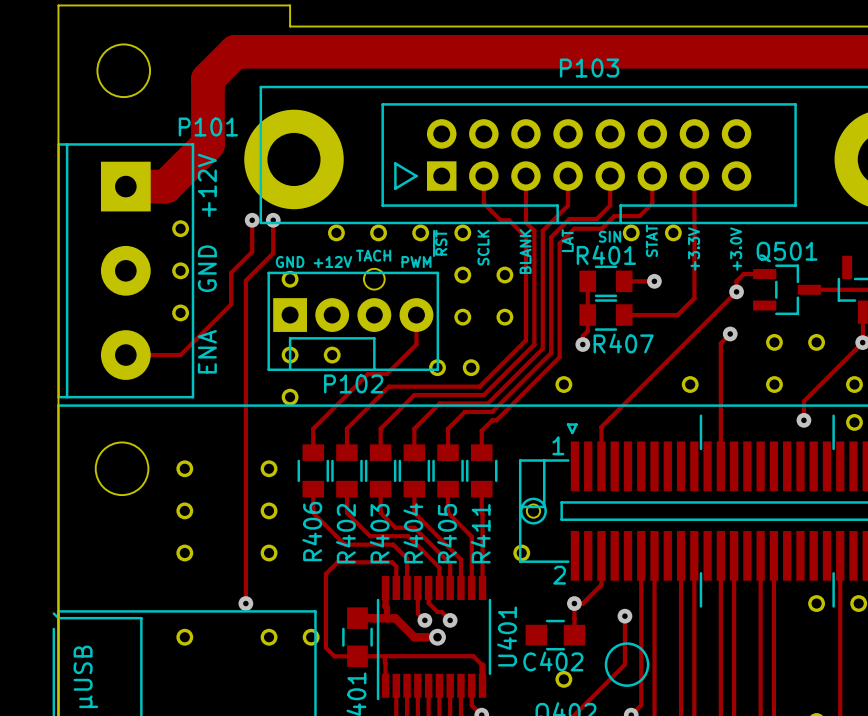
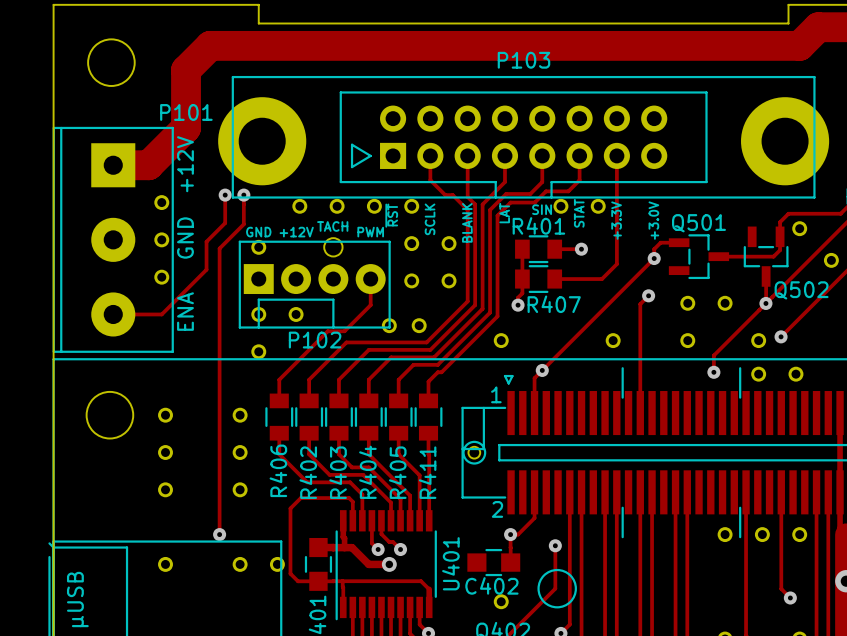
via: none -> (542, 370)
part: (521, 553) -> none

